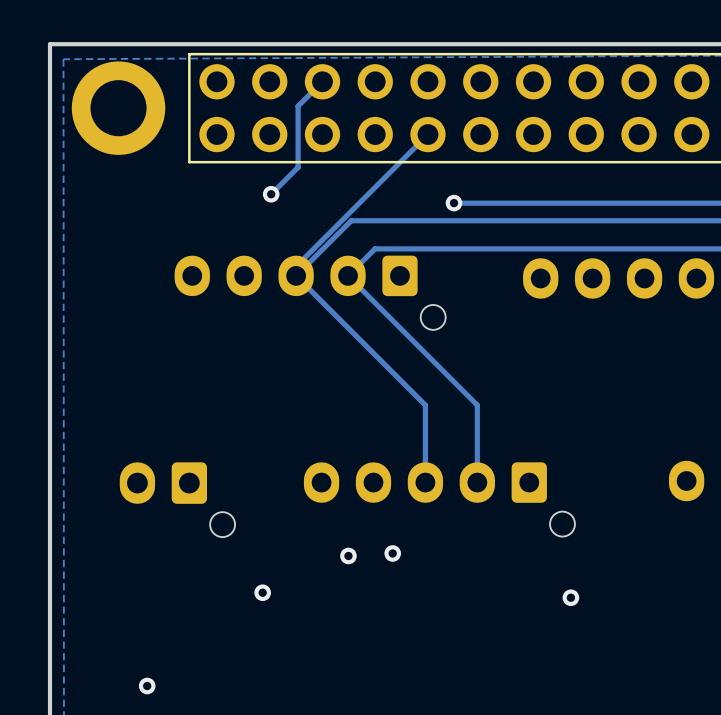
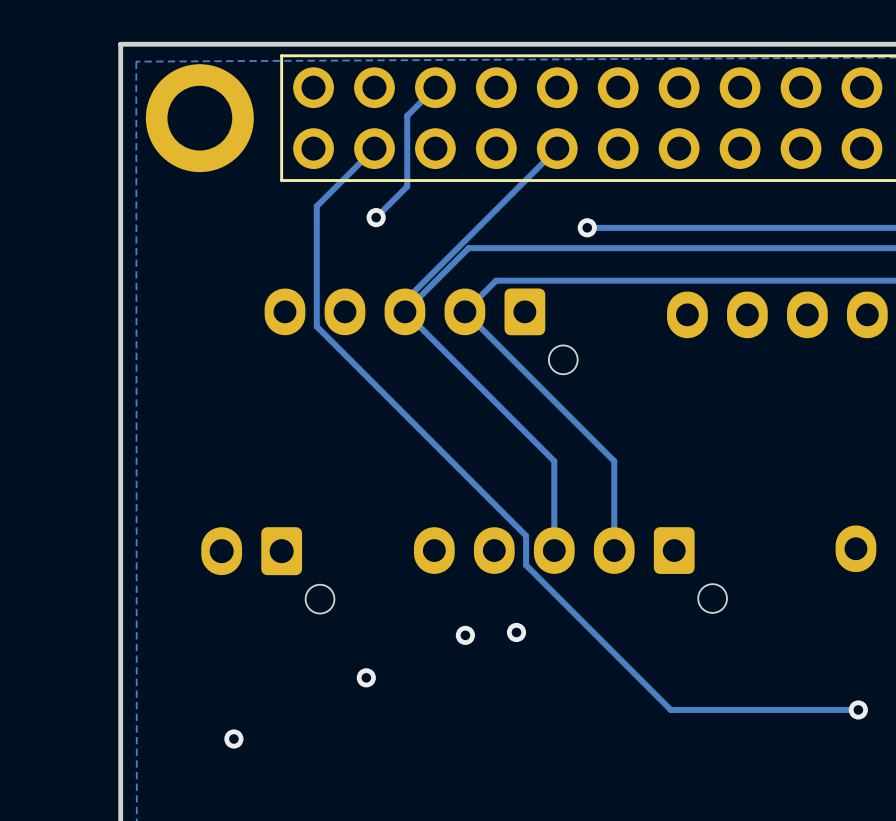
track: none -> (374, 148) (316, 206) (316, 326) (526, 535) (526, 565) (670, 709) (858, 709)
via position: (570, 597) -> (858, 709)
via position: (147, 686) -> (233, 738)

